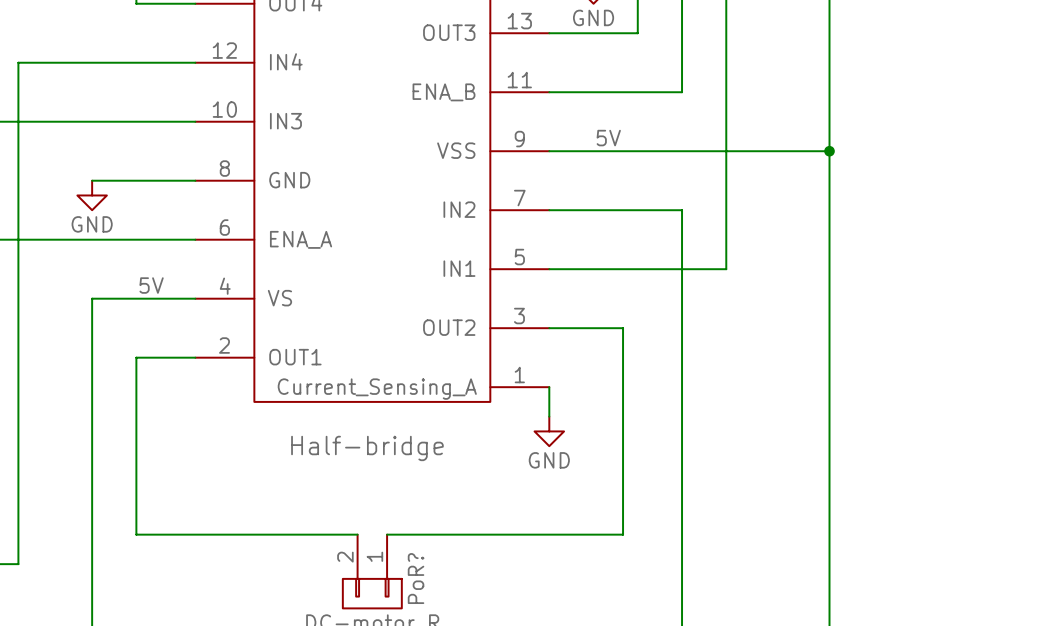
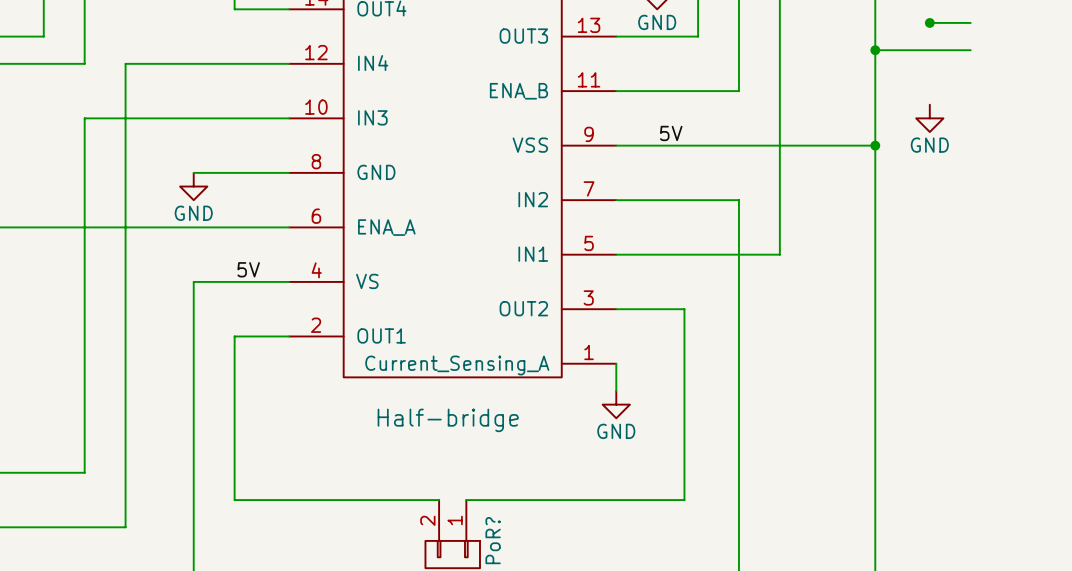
wire: none -> (929, 22) (970, 22)
junction: none -> (929, 22)
wire: none -> (875, 50) (970, 50)
junction: none -> (875, 50)
power symbol: none -> GND (929, 118)

